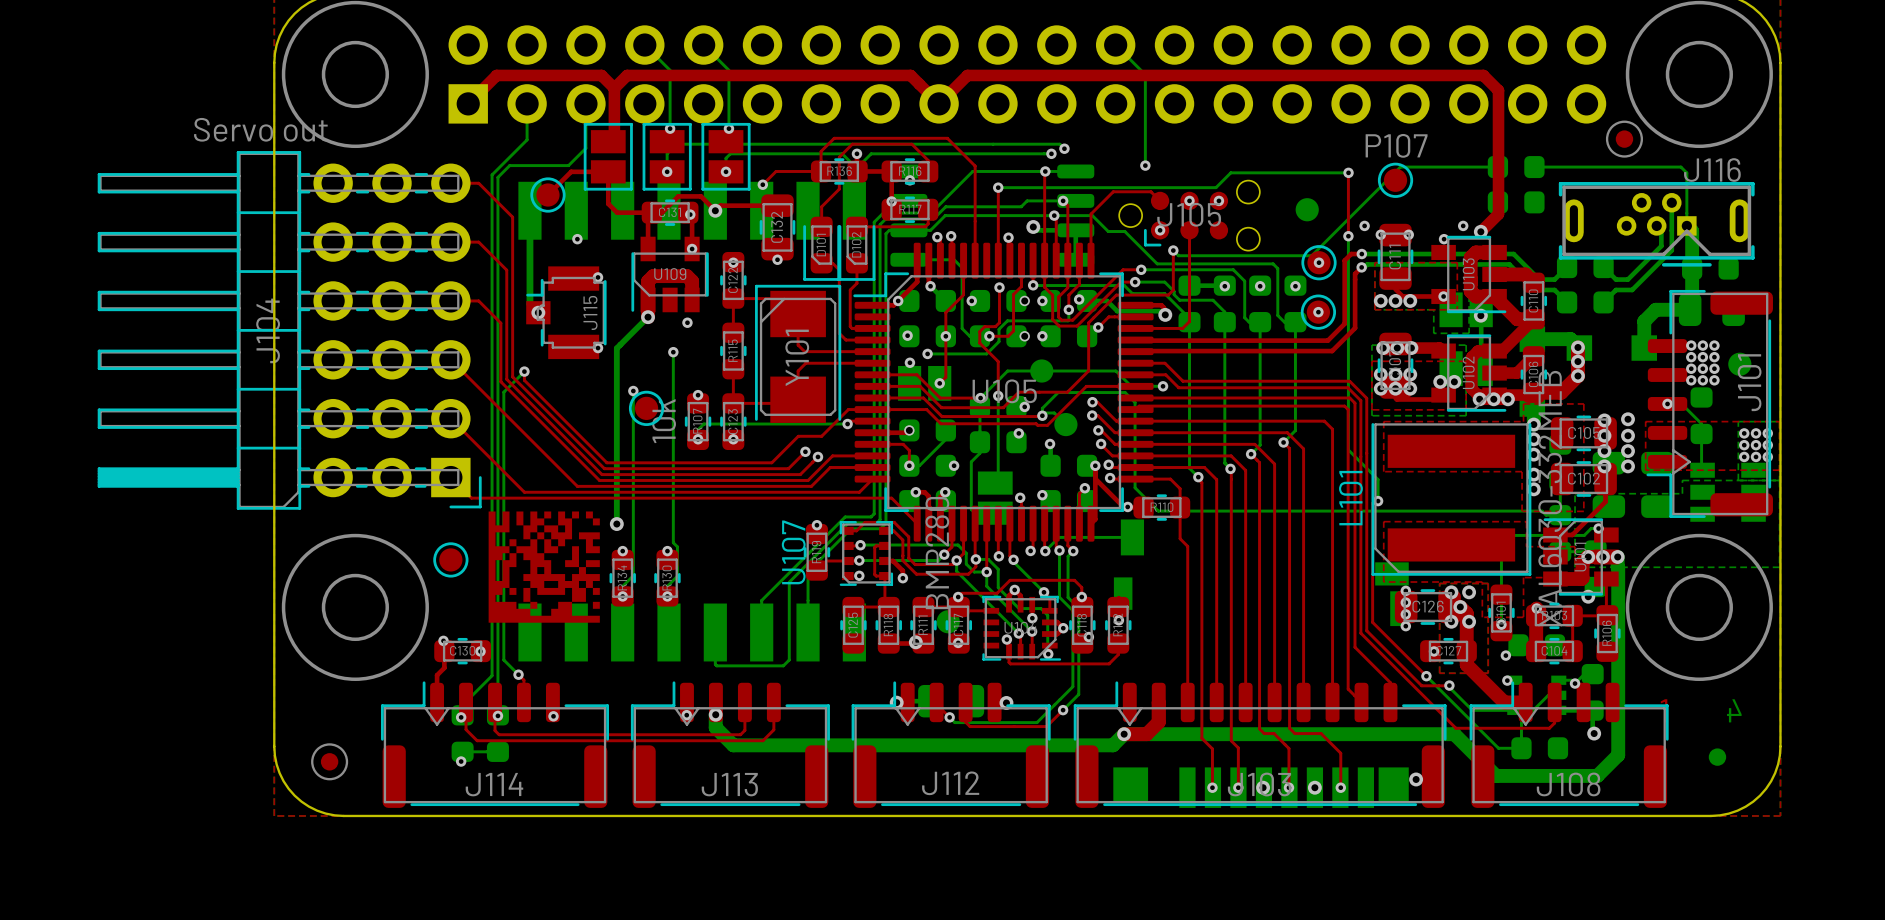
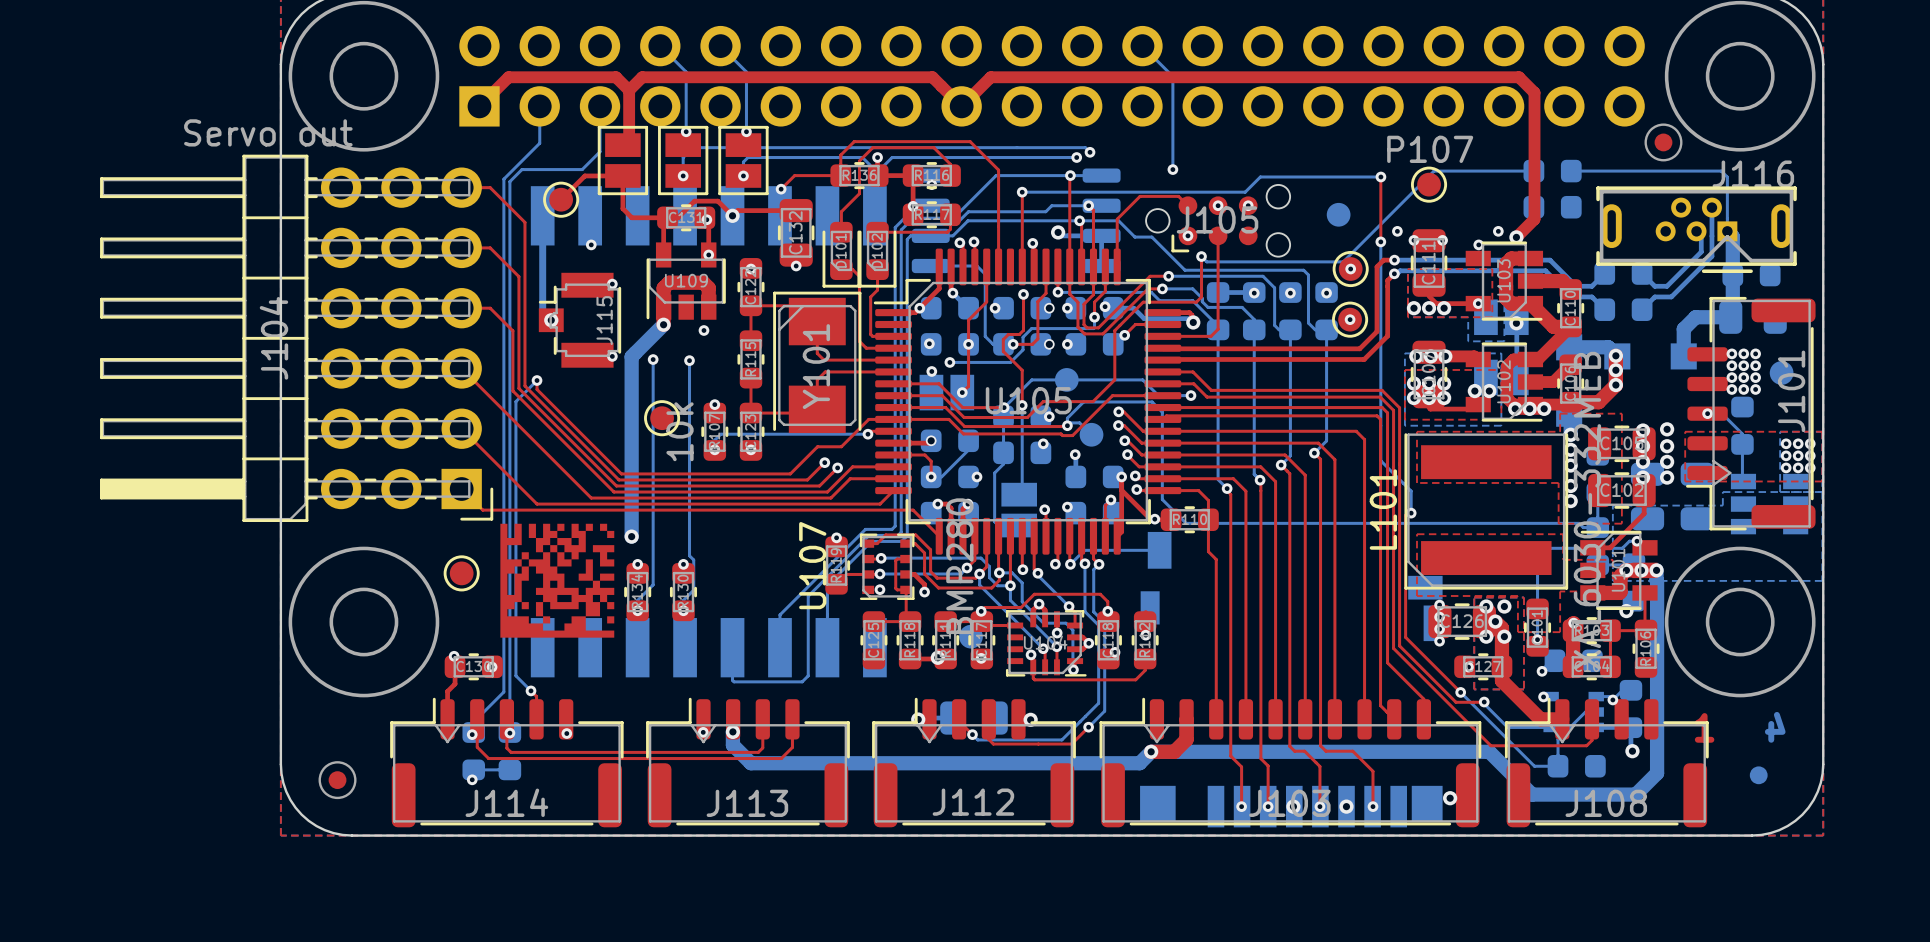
bottom track width: thin (648, 317) (616, 348) (616, 524) -> thick (663, 324) (631, 356) (631, 536)
bottom track: (633, 391) (633, 575) -> (653, 359) (653, 584) (648, 589)
via position: (633, 391) -> (653, 359)

